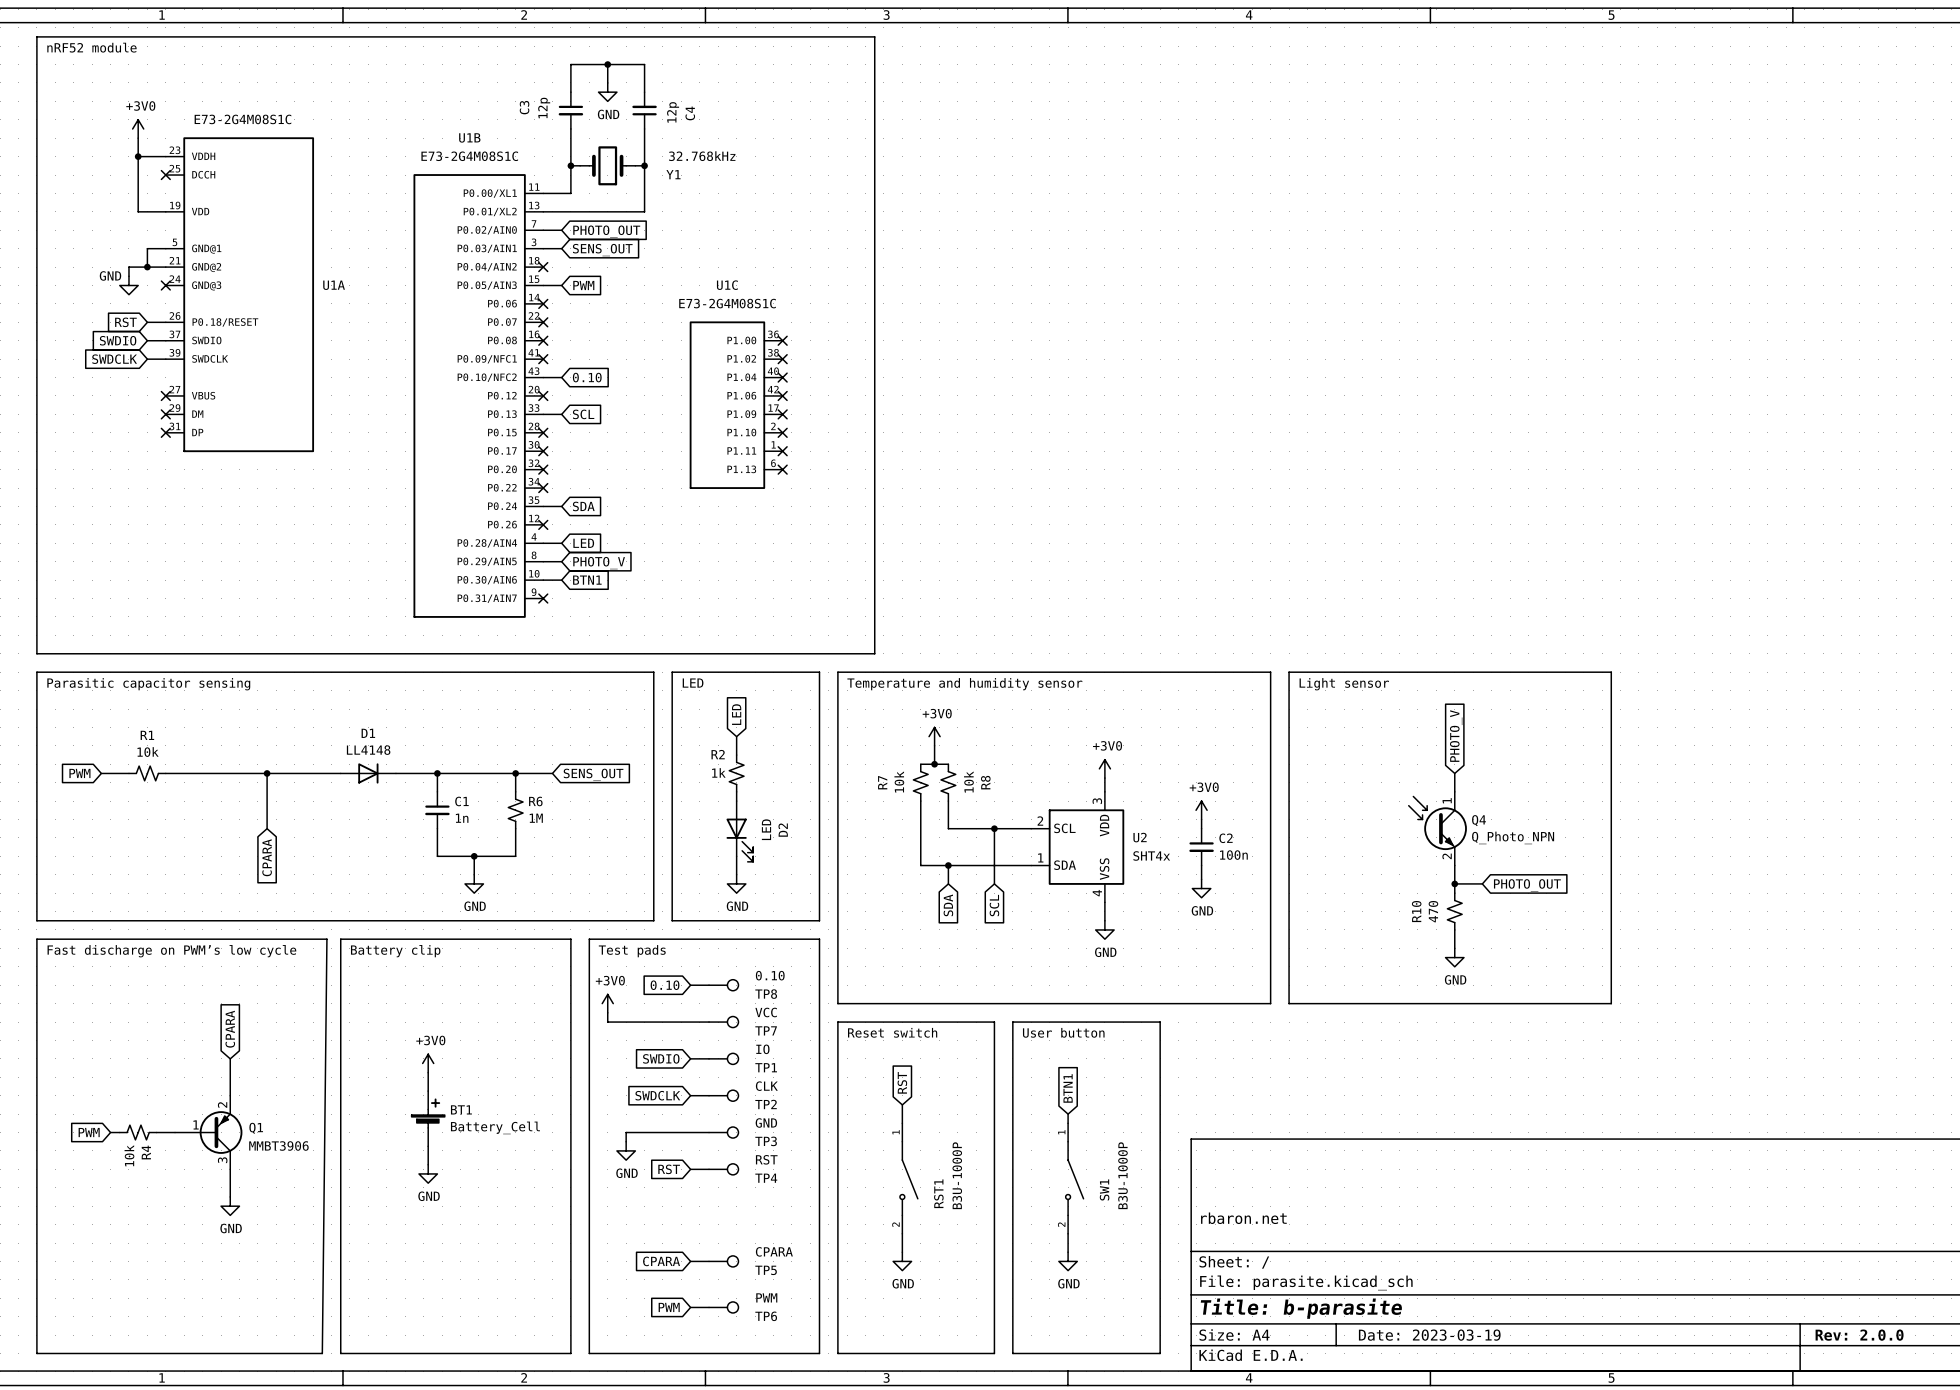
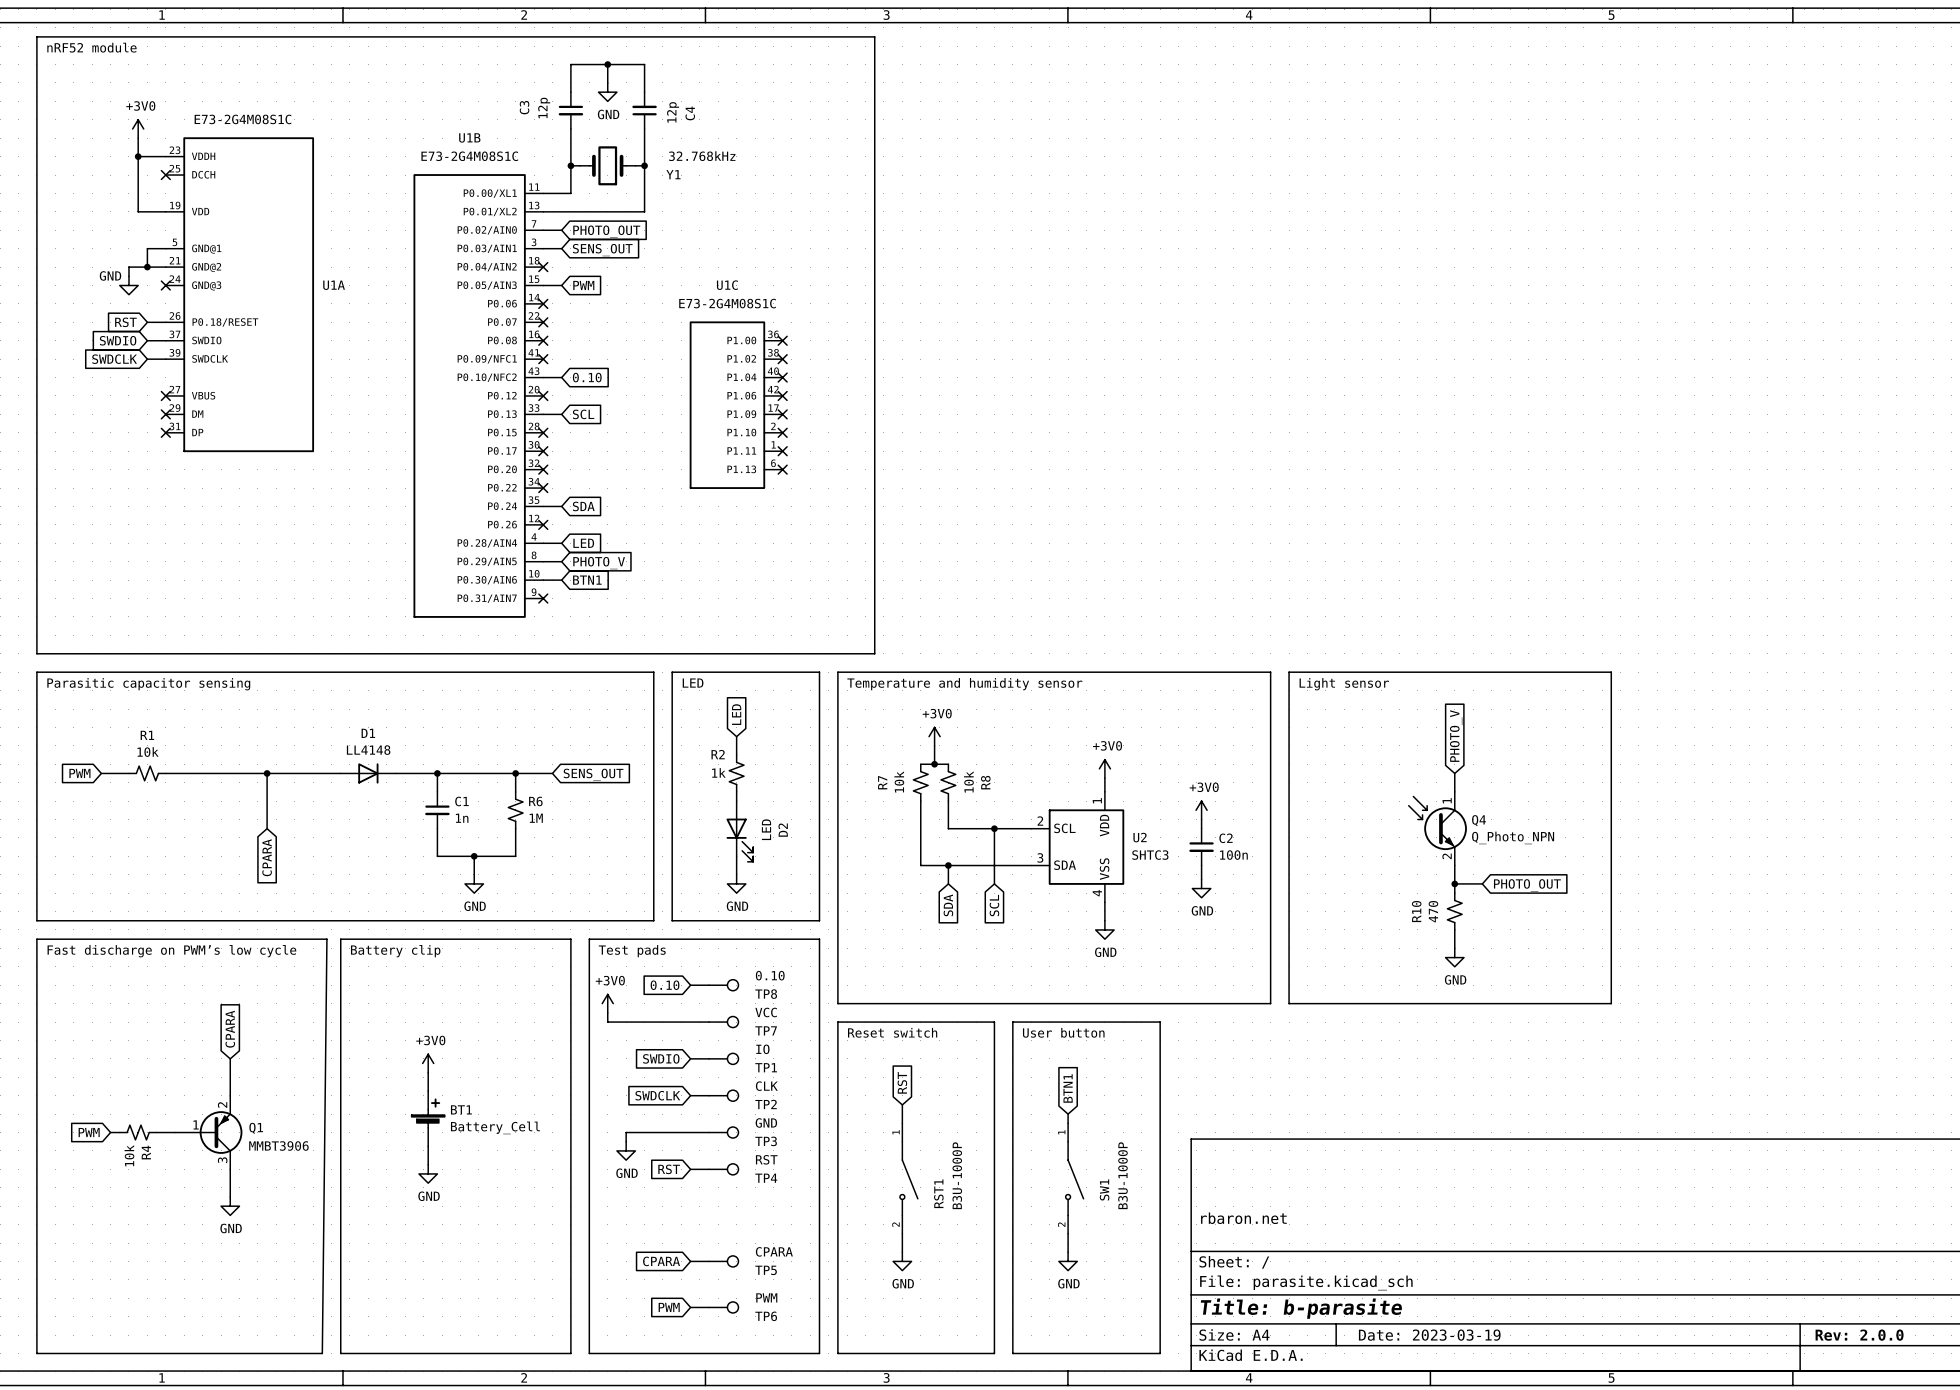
U2 pin number: 3 (1097, 801) -> 1 (1097, 800)
U2 value: SHT4x (1151, 855) -> SHTC3 (1150, 855)
U2 pin number: 1 (1040, 857) -> 3 (1040, 857)

